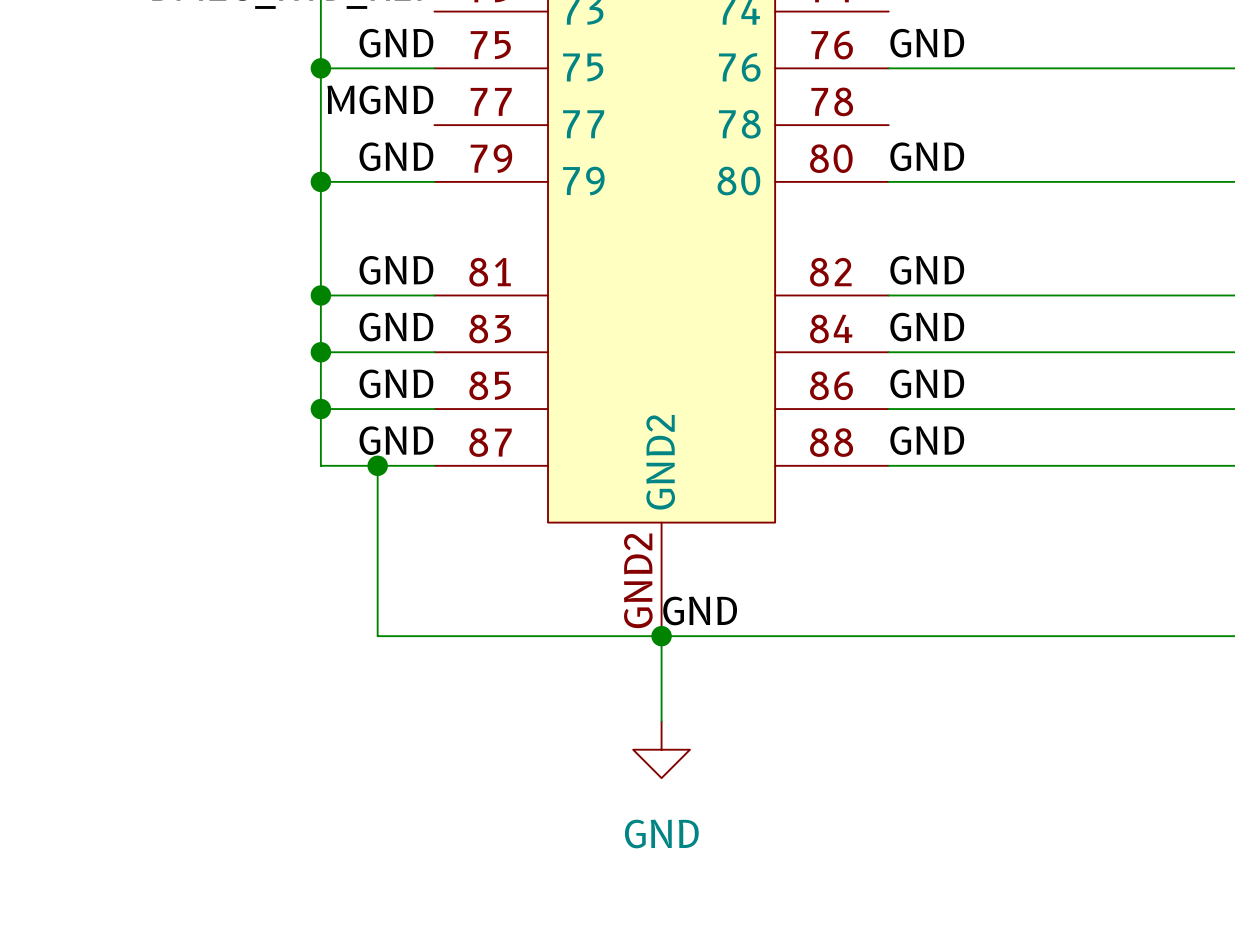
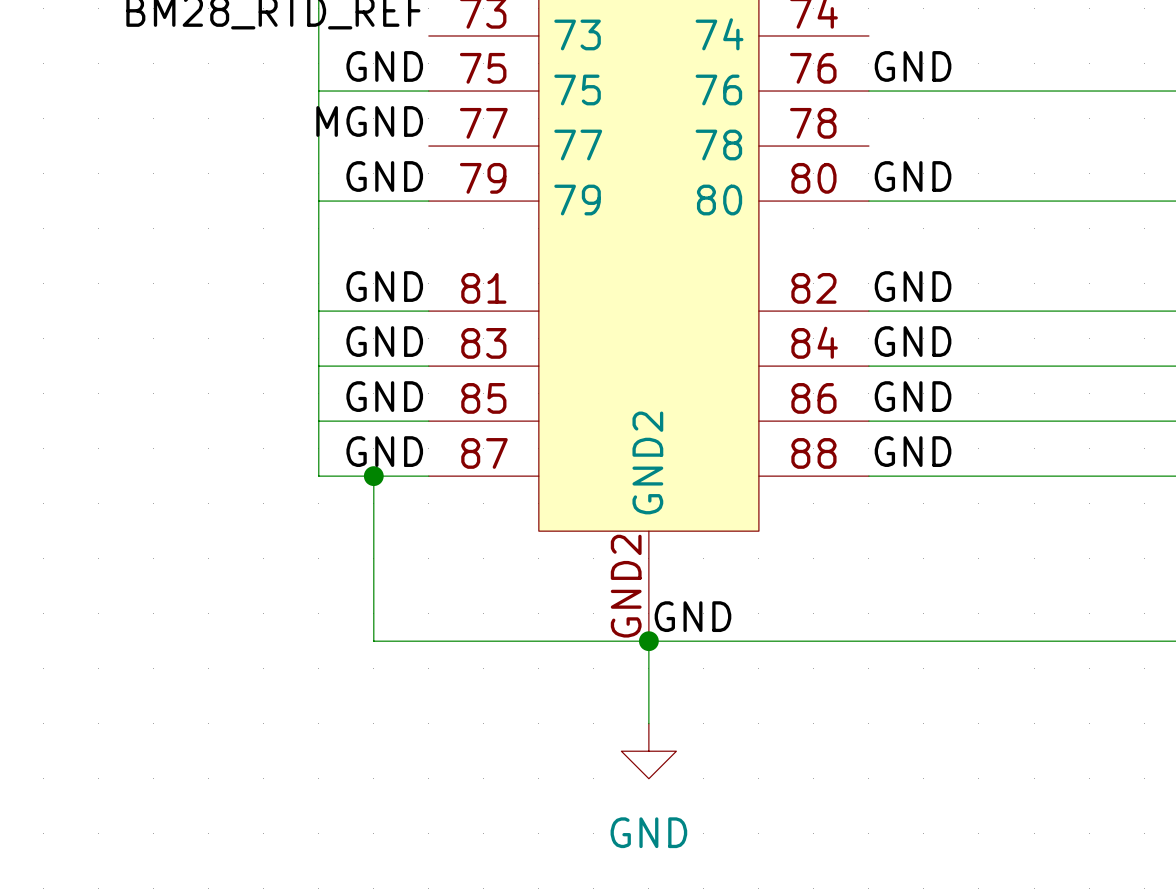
junction: (320, 68) -> none
junction: (320, 181) -> none
junction: (320, 295) -> none
junction: (320, 352) -> none
junction: (320, 409) -> none

